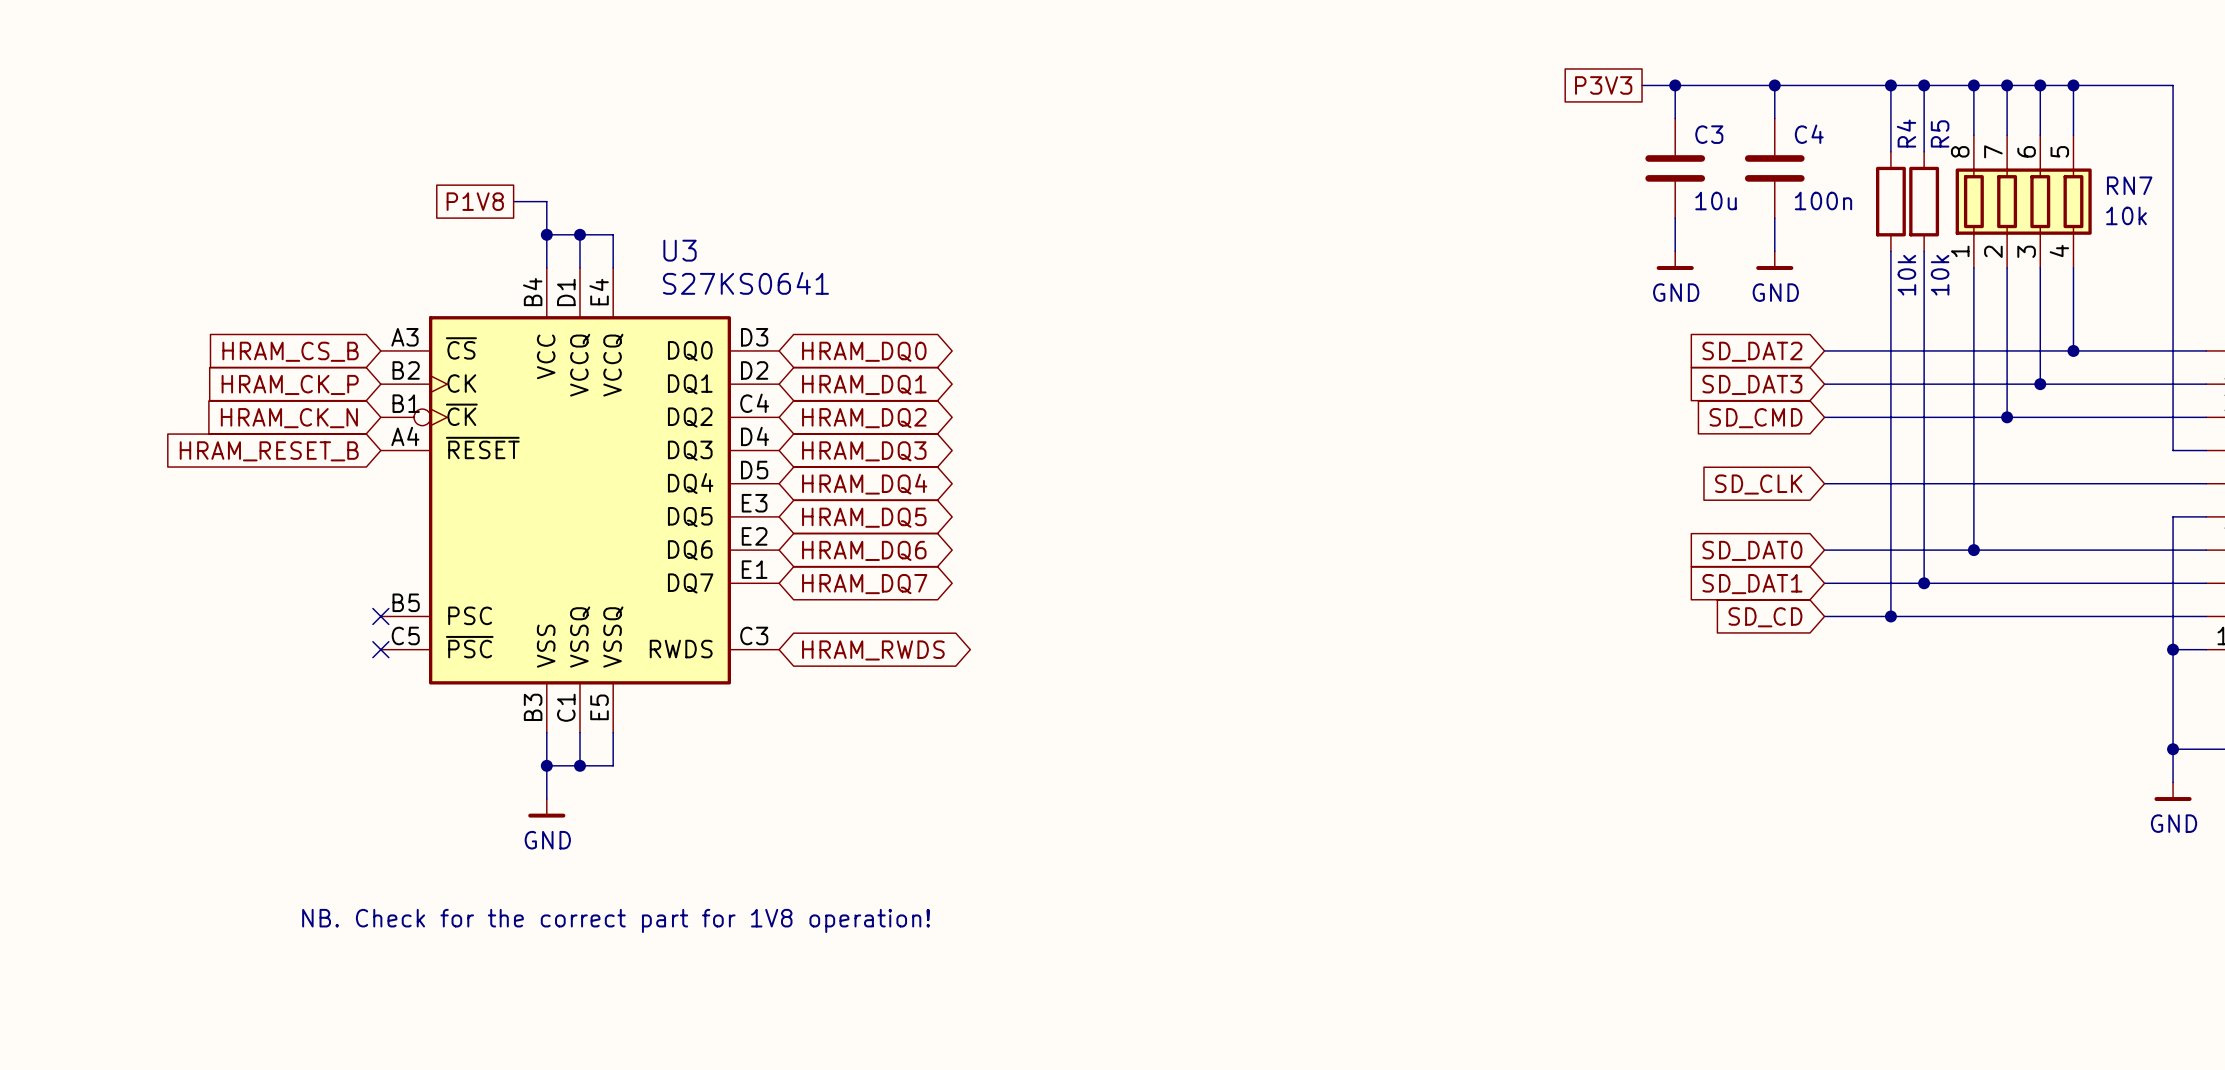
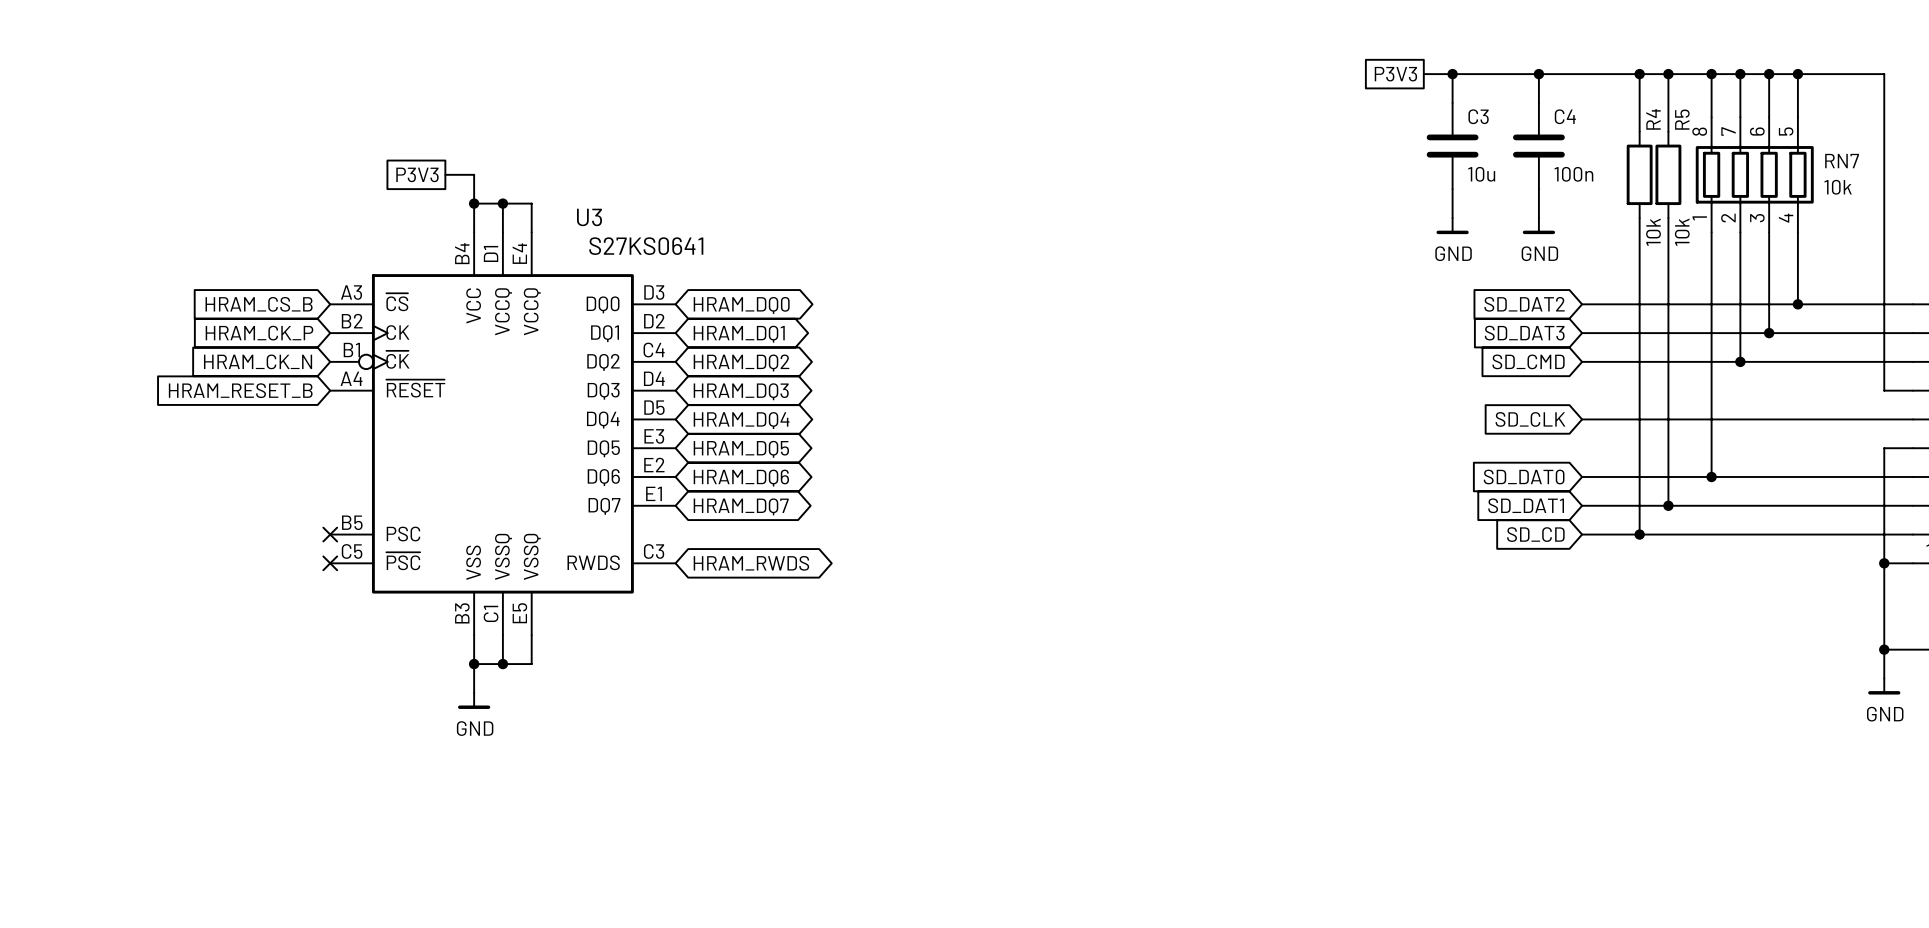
global label: P1V8 (475, 201) -> P3V3 (417, 174)
text: NB. Check for the correct part for 1V8 operation! (616, 920) -> none

